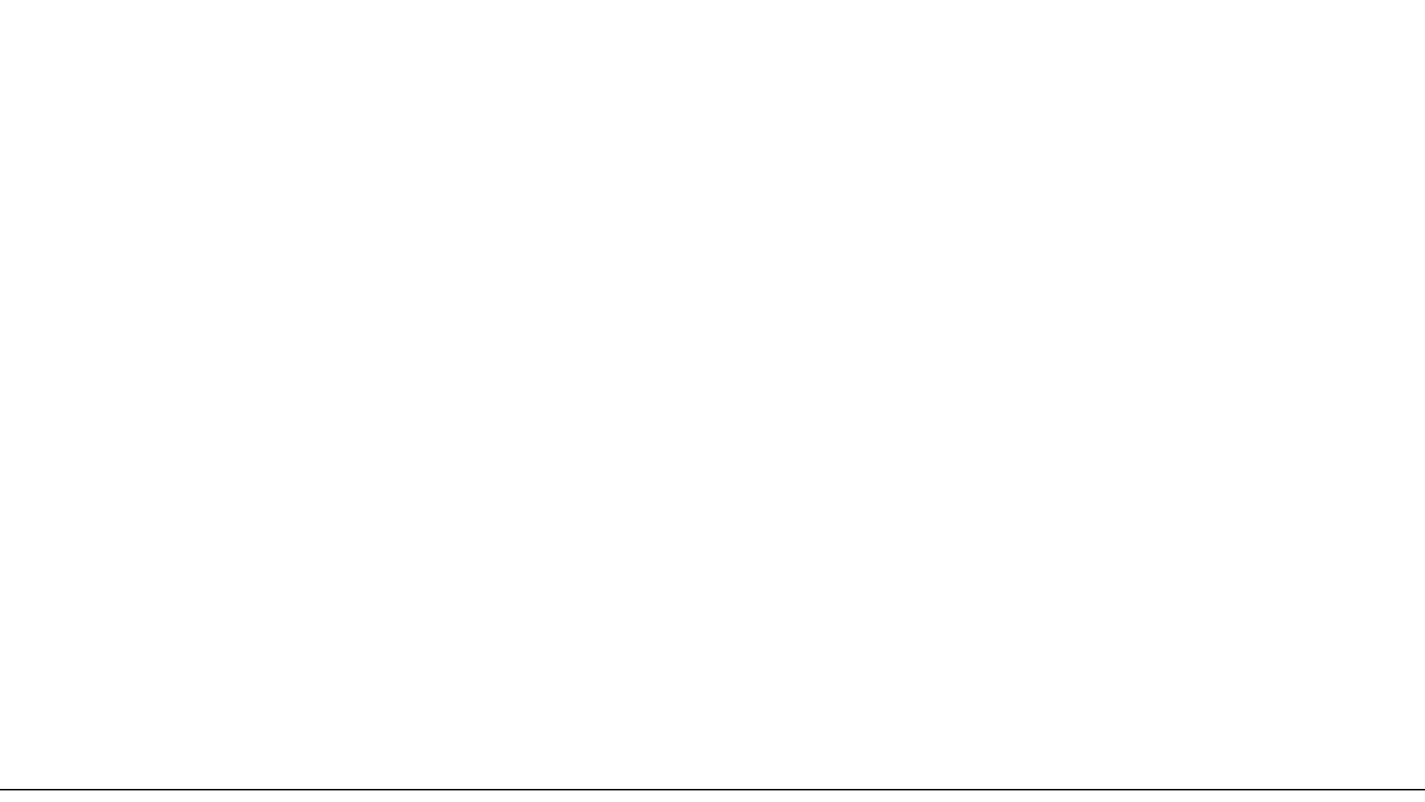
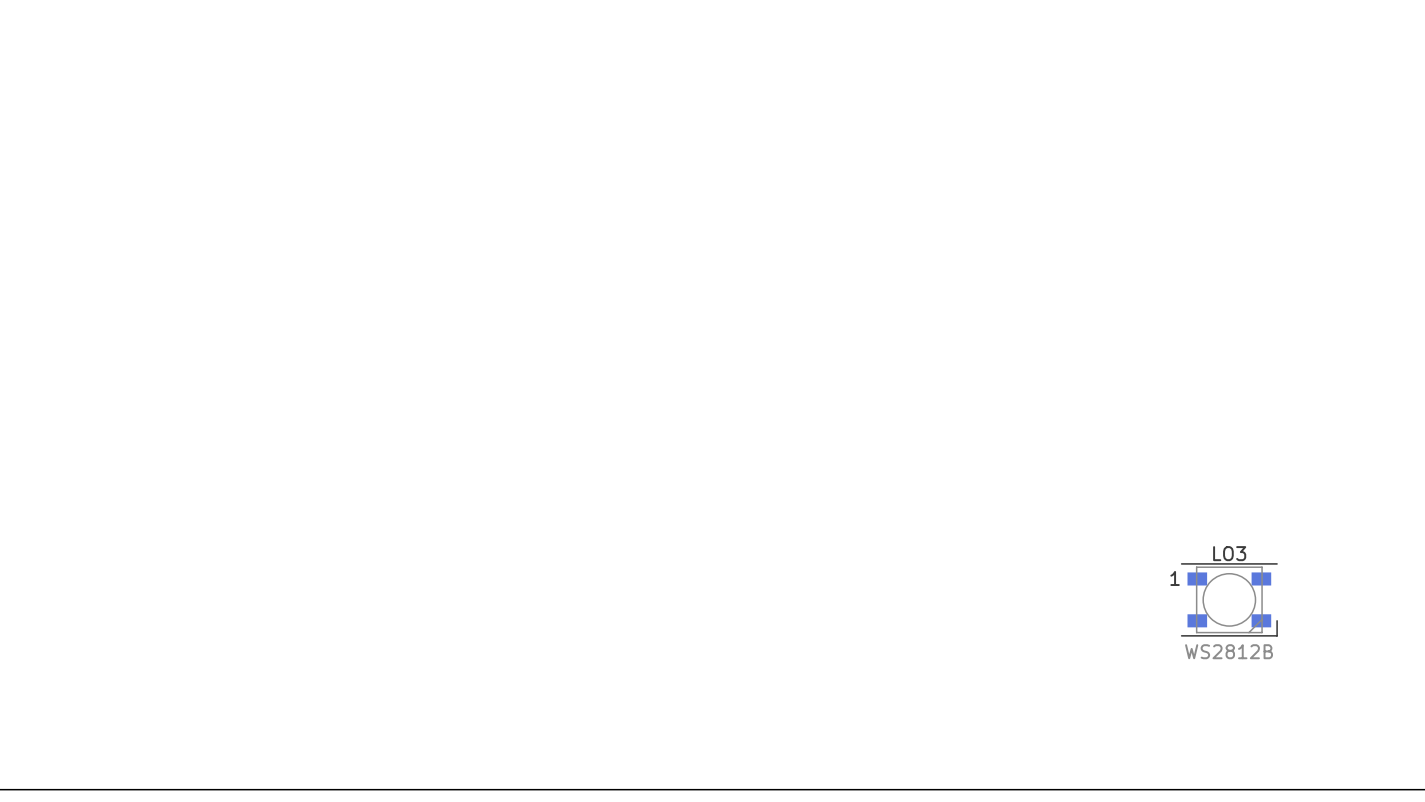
LO3: none -> WS2812B (1229, 599)

